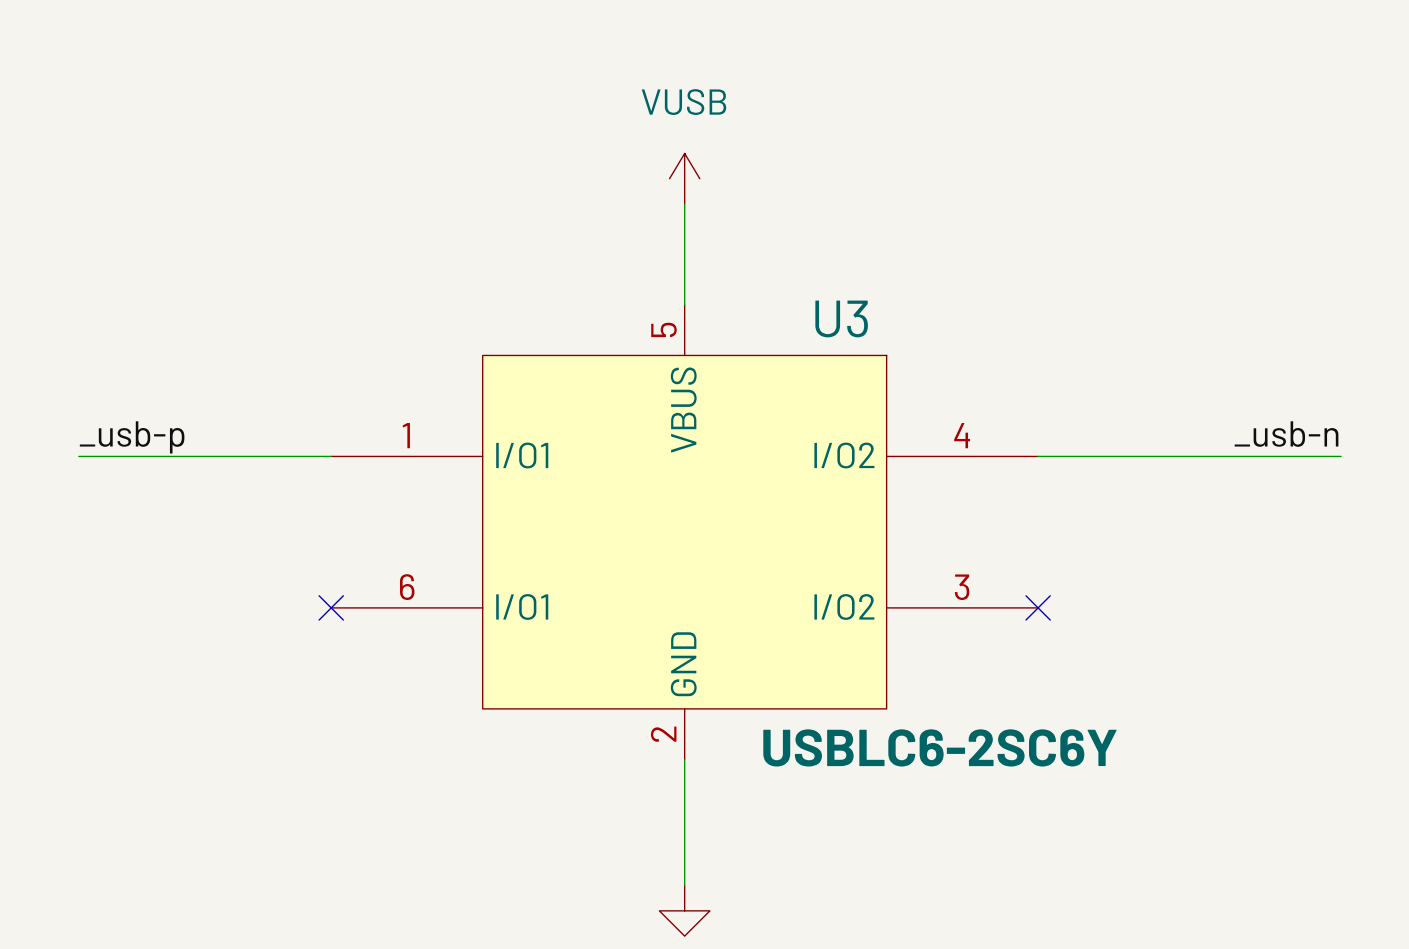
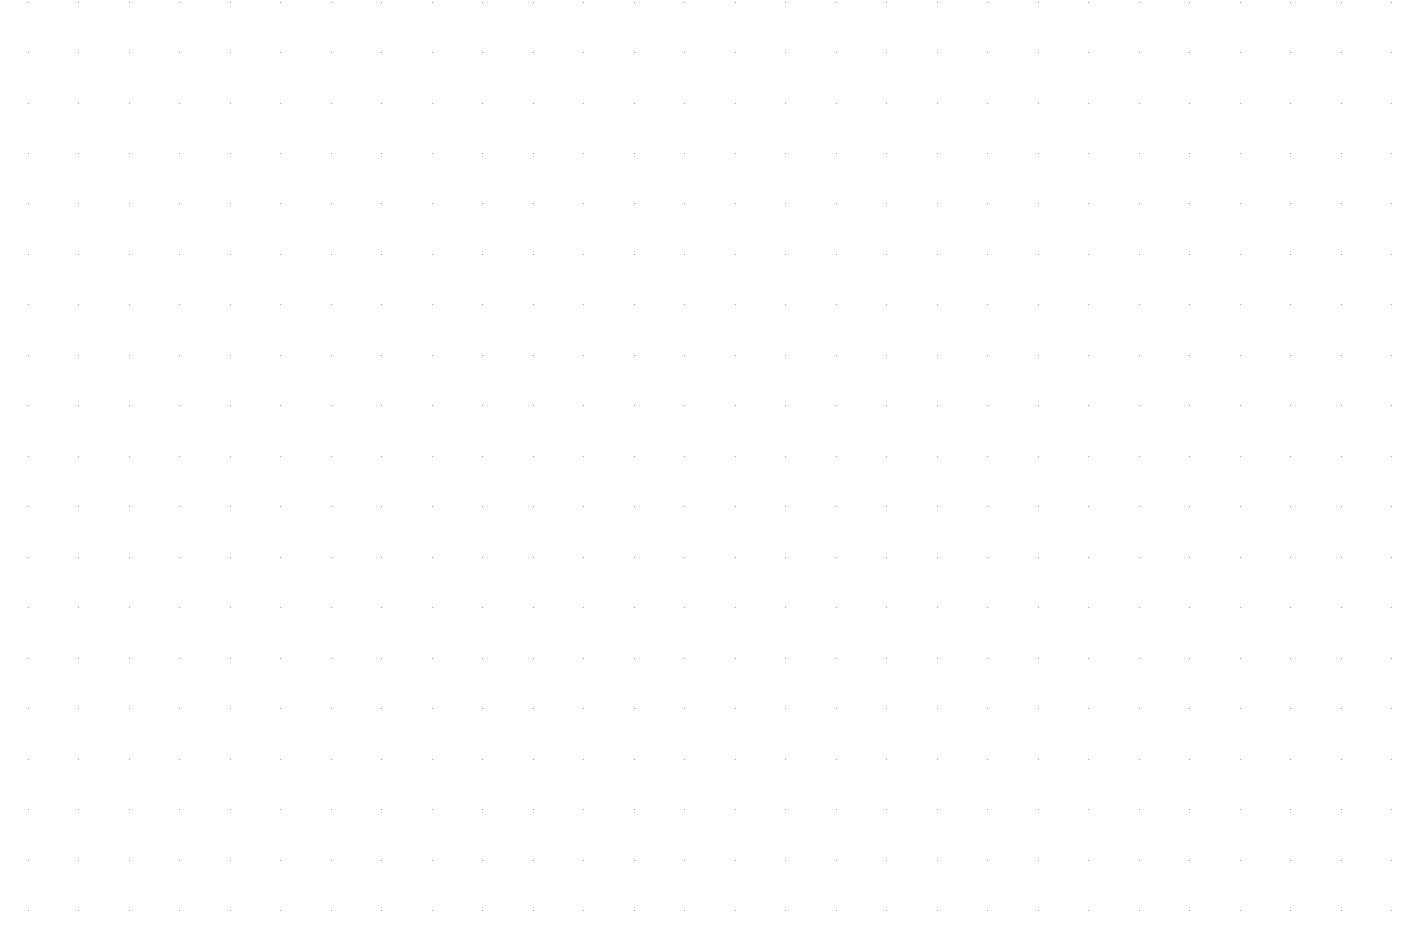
power symbol: VUSB (684, 178) -> none
wire: (684, 203) (684, 304) -> none
label: _usb-n (1286, 434) -> none
label: _usb-p (132, 437) -> none
wire: (78, 456) (331, 456) -> none
wire: (1038, 456) (1341, 456) -> none
U3: USBLC6-2SC6Y (684, 532) -> none
no-connect mark: (331, 607) -> none
no-connect mark: (1038, 607) -> none
wire: (684, 759) (684, 885) -> none
power symbol: (684, 910) -> none

